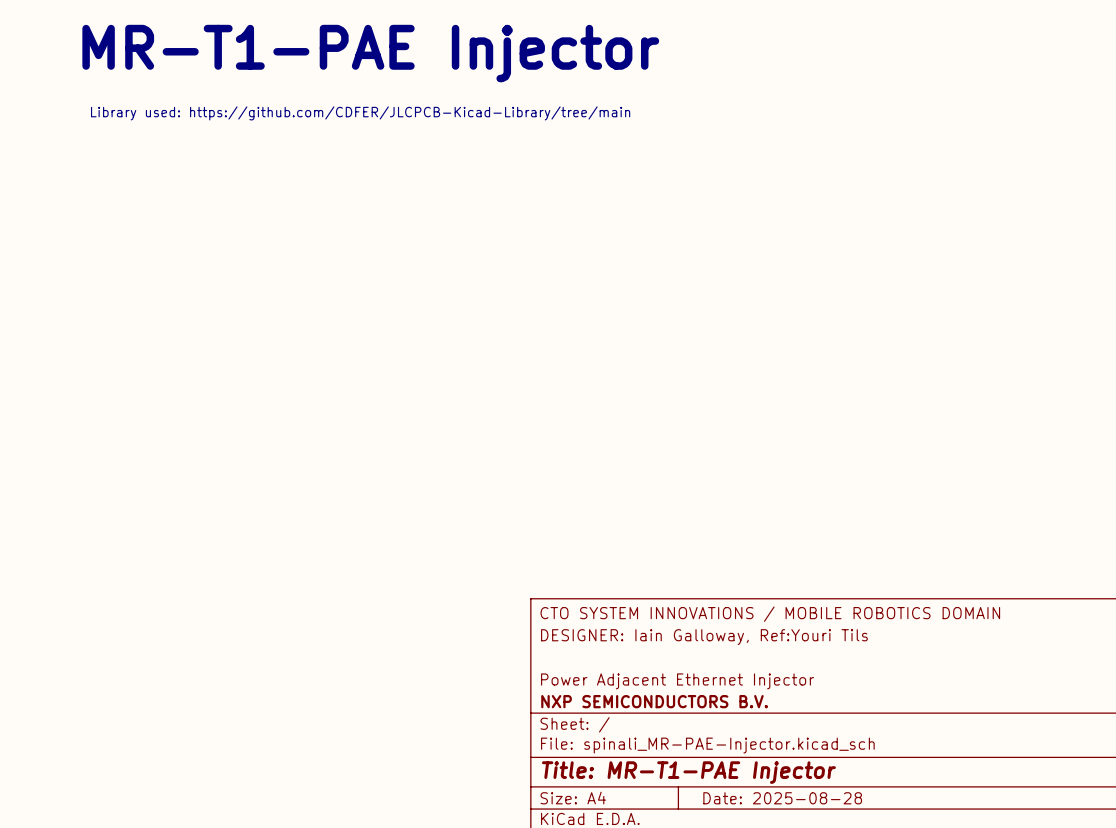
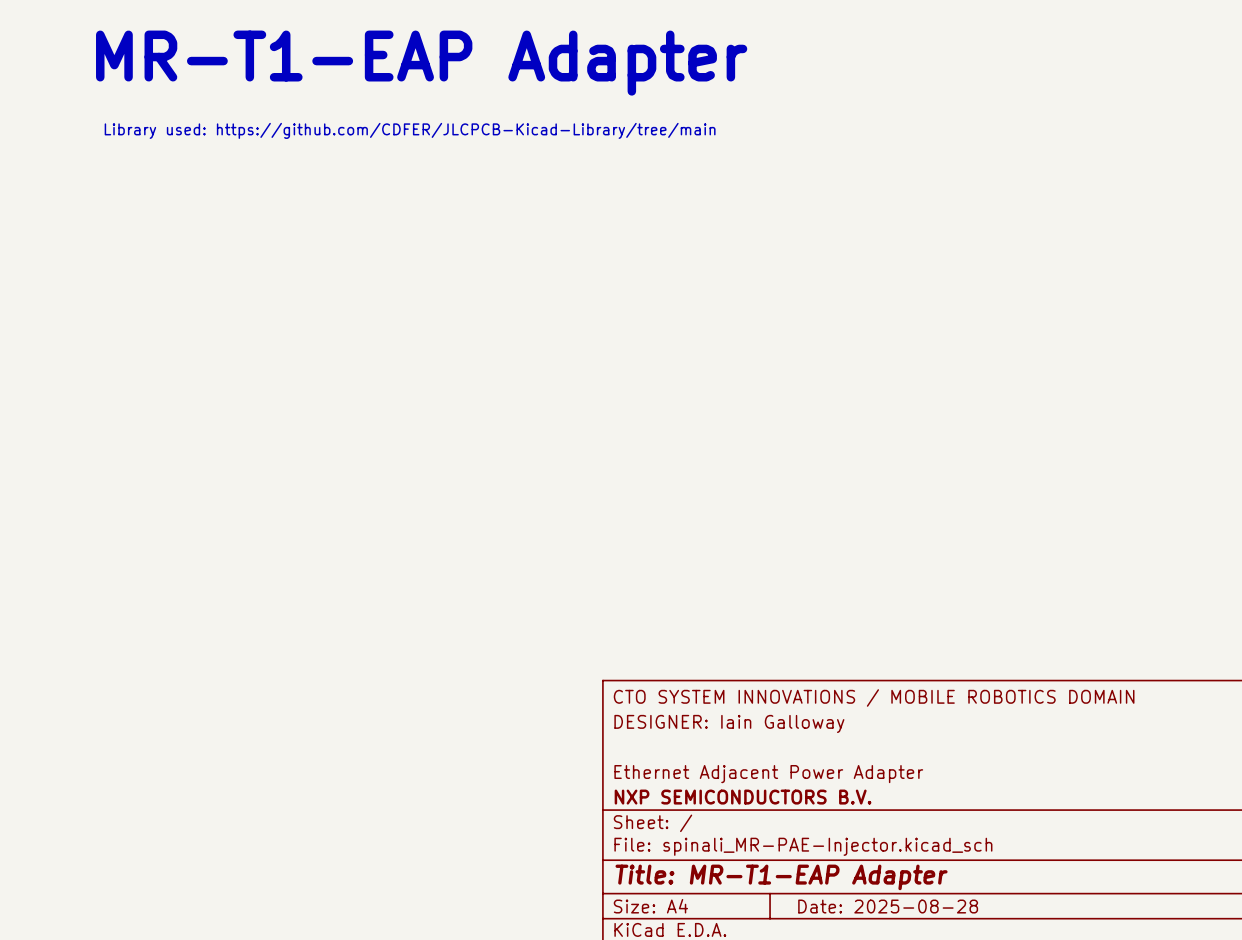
text: MR-T1-PAE Injector (370, 53) -> MR-T1-EAP Adapter (421, 63)
title block: DESIGNER: Iain Galloway, Ref:Youri Tils (704, 637) -> DESIGNER: Iain Galloway (729, 723)
title block: Power Adjacent Ethernet Injector (677, 681) -> Ethernet Adjacent Power Adapter (768, 774)
title block: Title: MR-T1-PAE Injector (688, 772) -> Title: MR-T1-EAP Adapter (781, 877)

